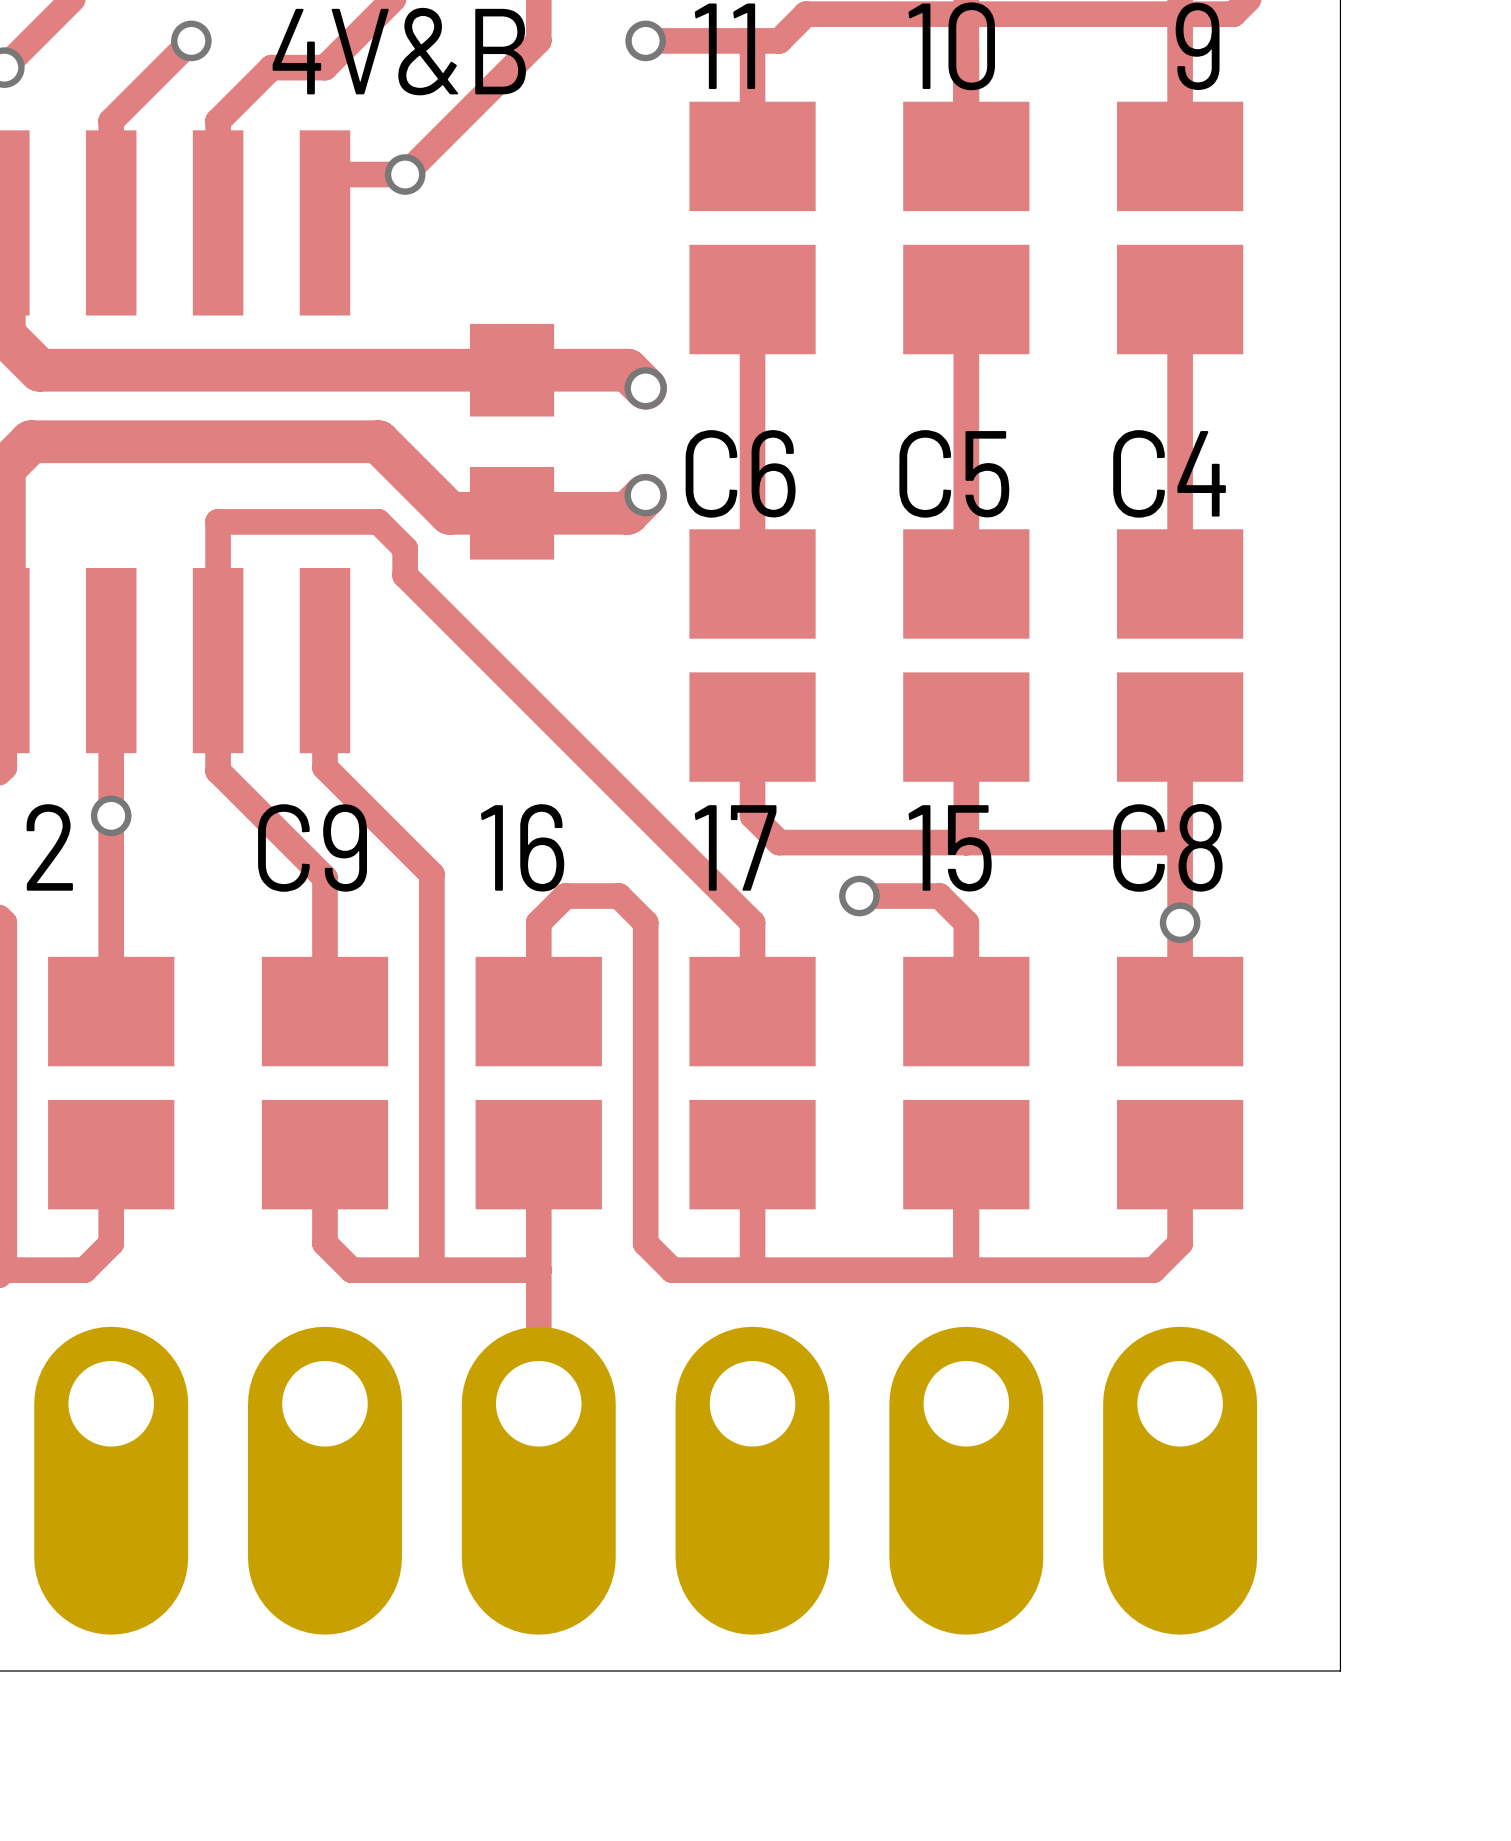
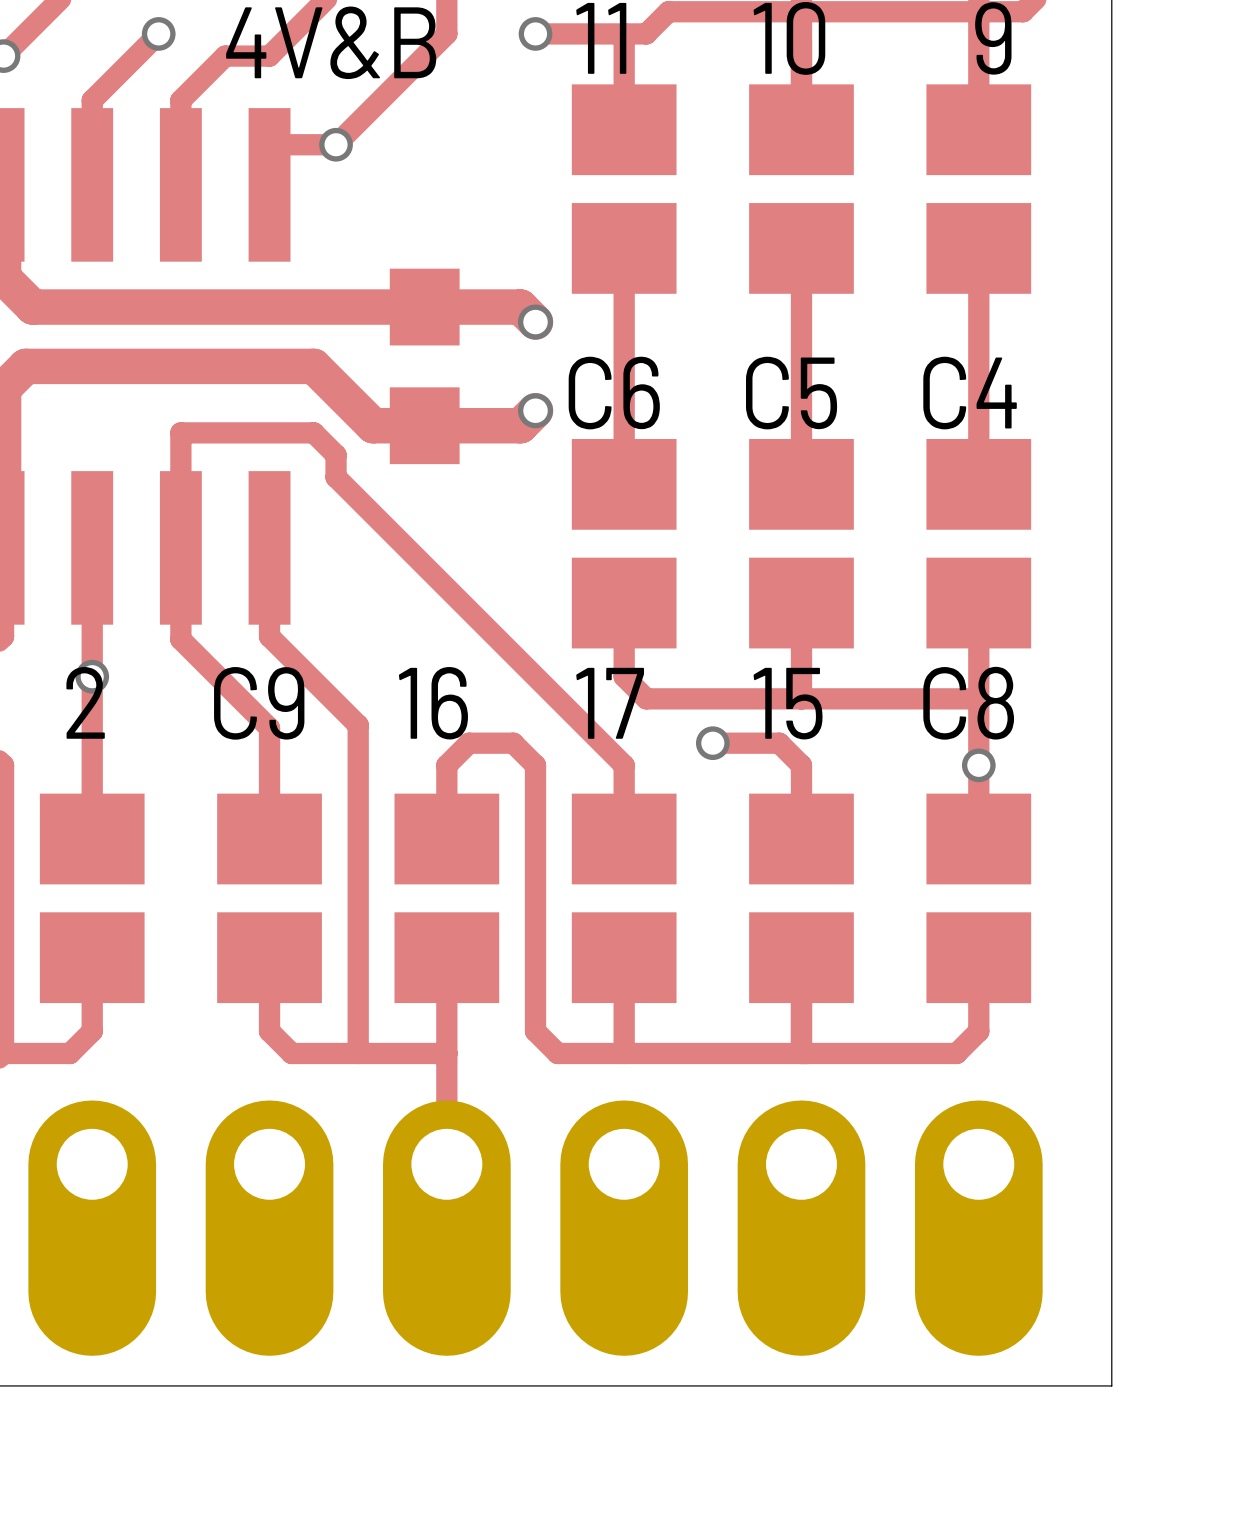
text position: 2 (49, 847) -> 2 (85, 702)

